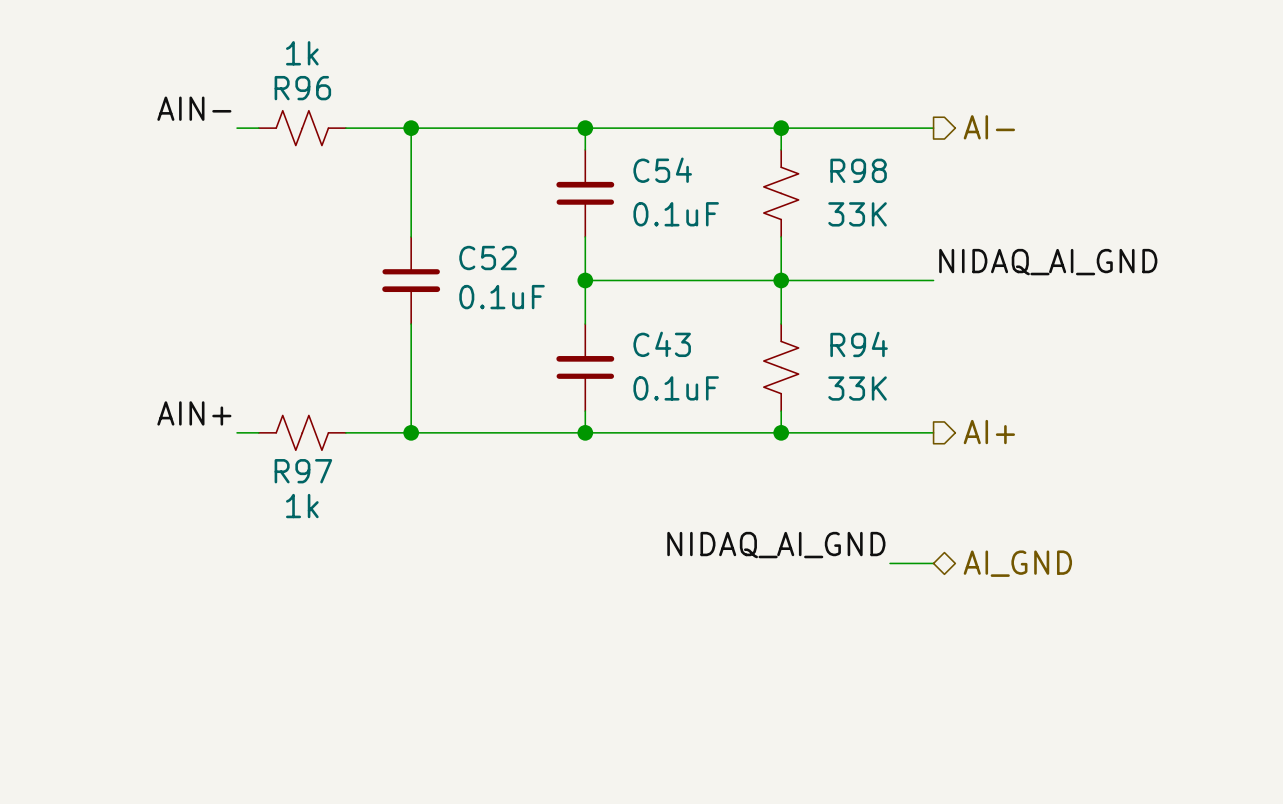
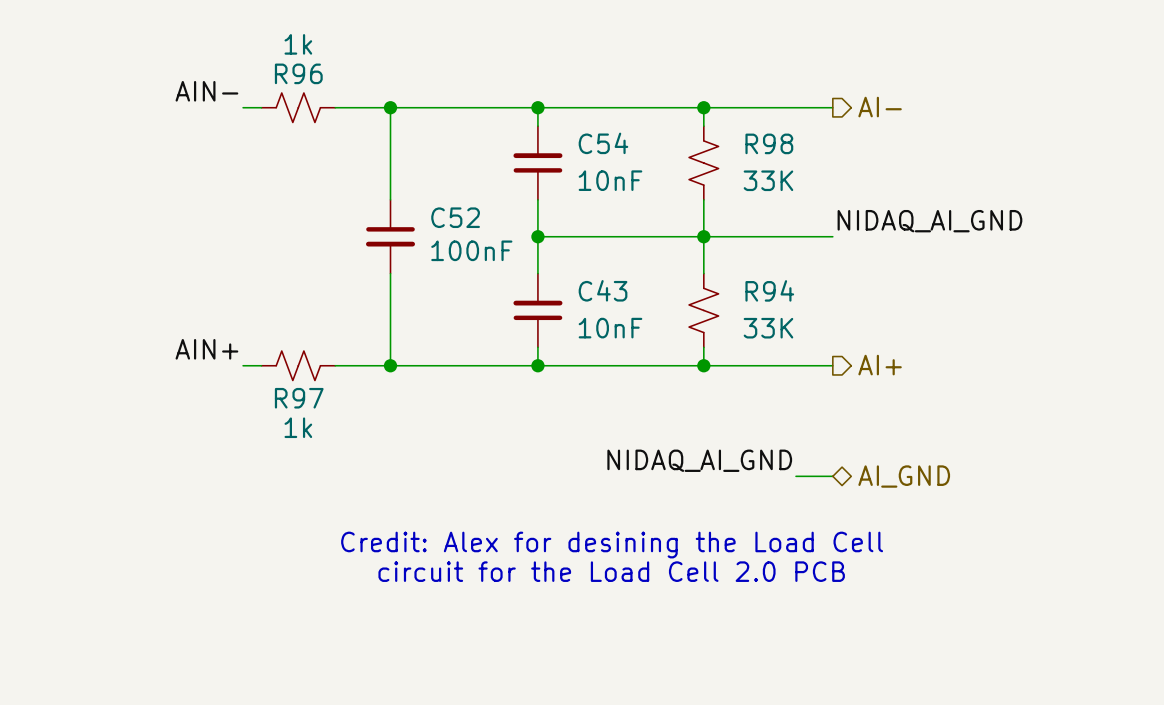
C54 value: 0.1uF (676, 214) -> 10nF (610, 180)
C52 value: 0.1uF (502, 297) -> 100nF (471, 250)
C43 value: 0.1uF (676, 388) -> 10nF (610, 328)
text: none -> Credit: Alex for desining the Load Cell (612, 545)
text: none -> circuit for the Load Cell 2.0 PCB (611, 571)

